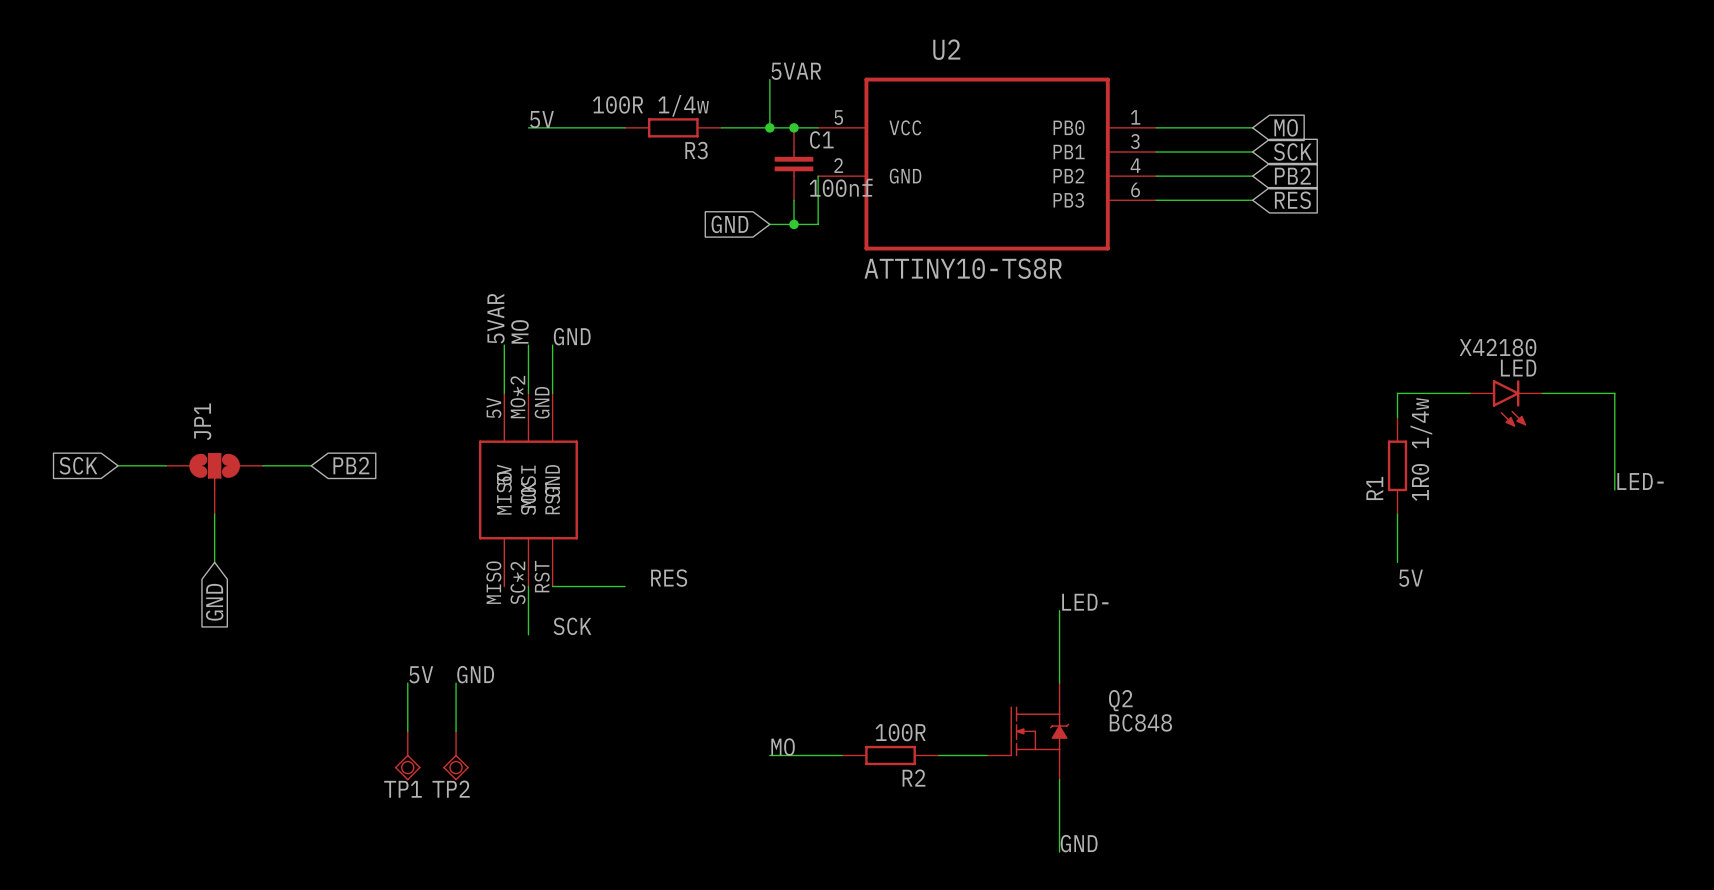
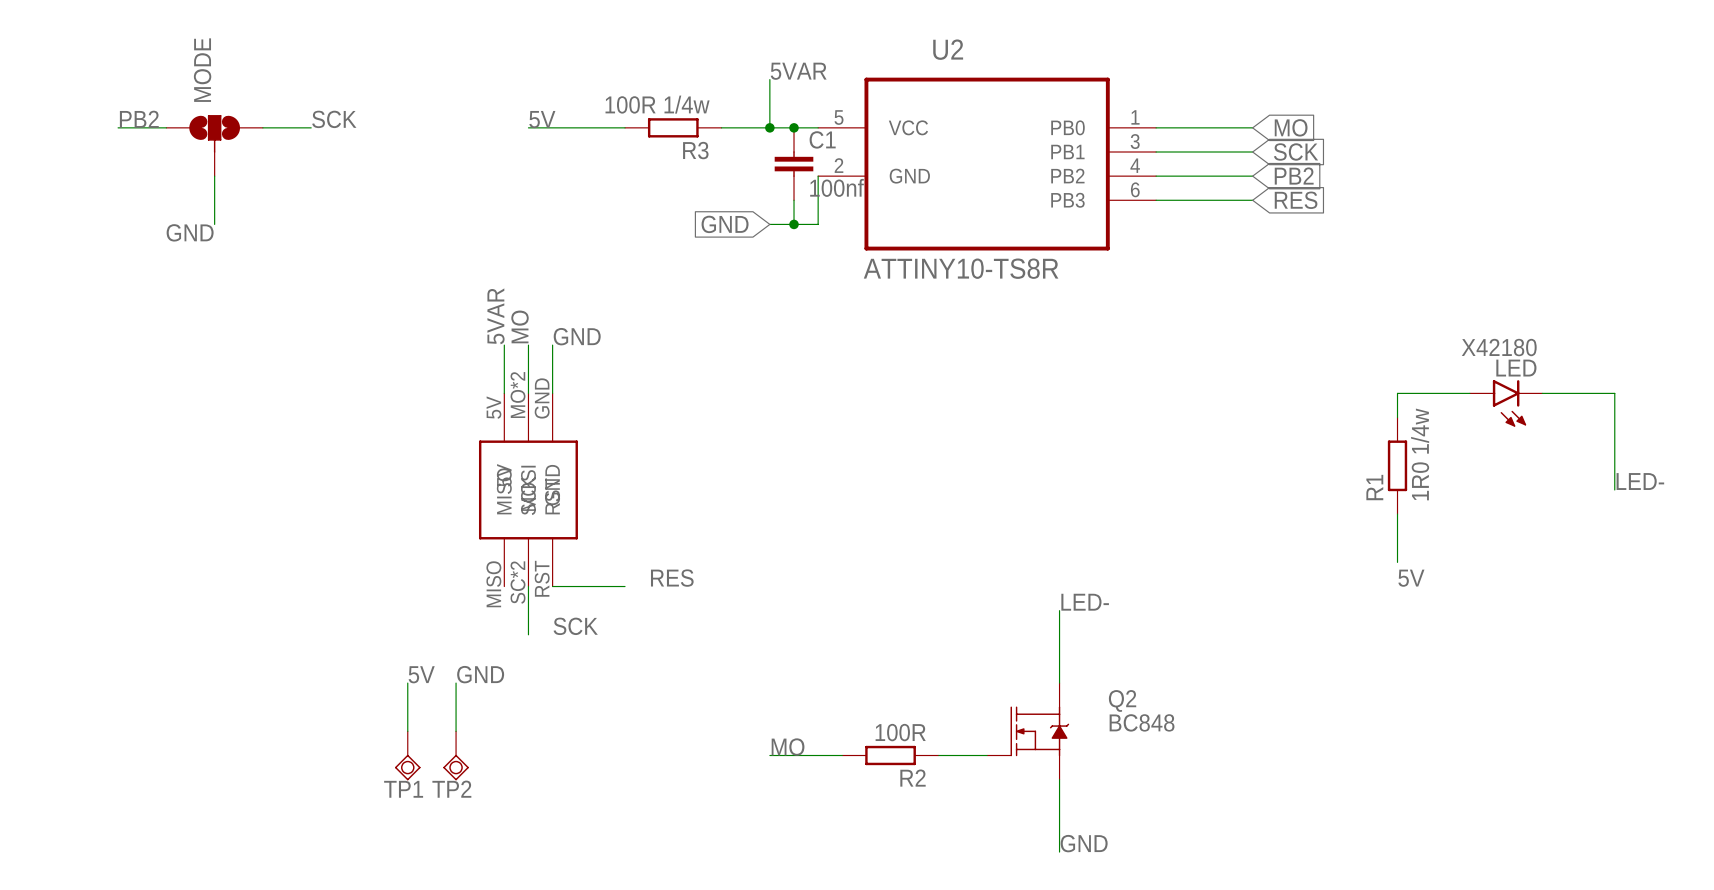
label: none -> PB2 (139, 119)
label: none -> SCK (334, 119)
wire: none -> (118, 127) (166, 127)
wire: none -> (262, 127) (311, 127)
MODE: none -> (214, 145)
wire: none -> (214, 176) (214, 224)
label: none -> GND (190, 232)
global label: SCK (78, 465) -> none
wire: (118, 465) (166, 465) -> none
wire: (262, 465) (311, 465) -> none
global label: PB2 (351, 465) -> none
JP1: (214, 483) -> none
wire: (214, 514) (214, 562) -> none
global label: GND (214, 602) -> none

